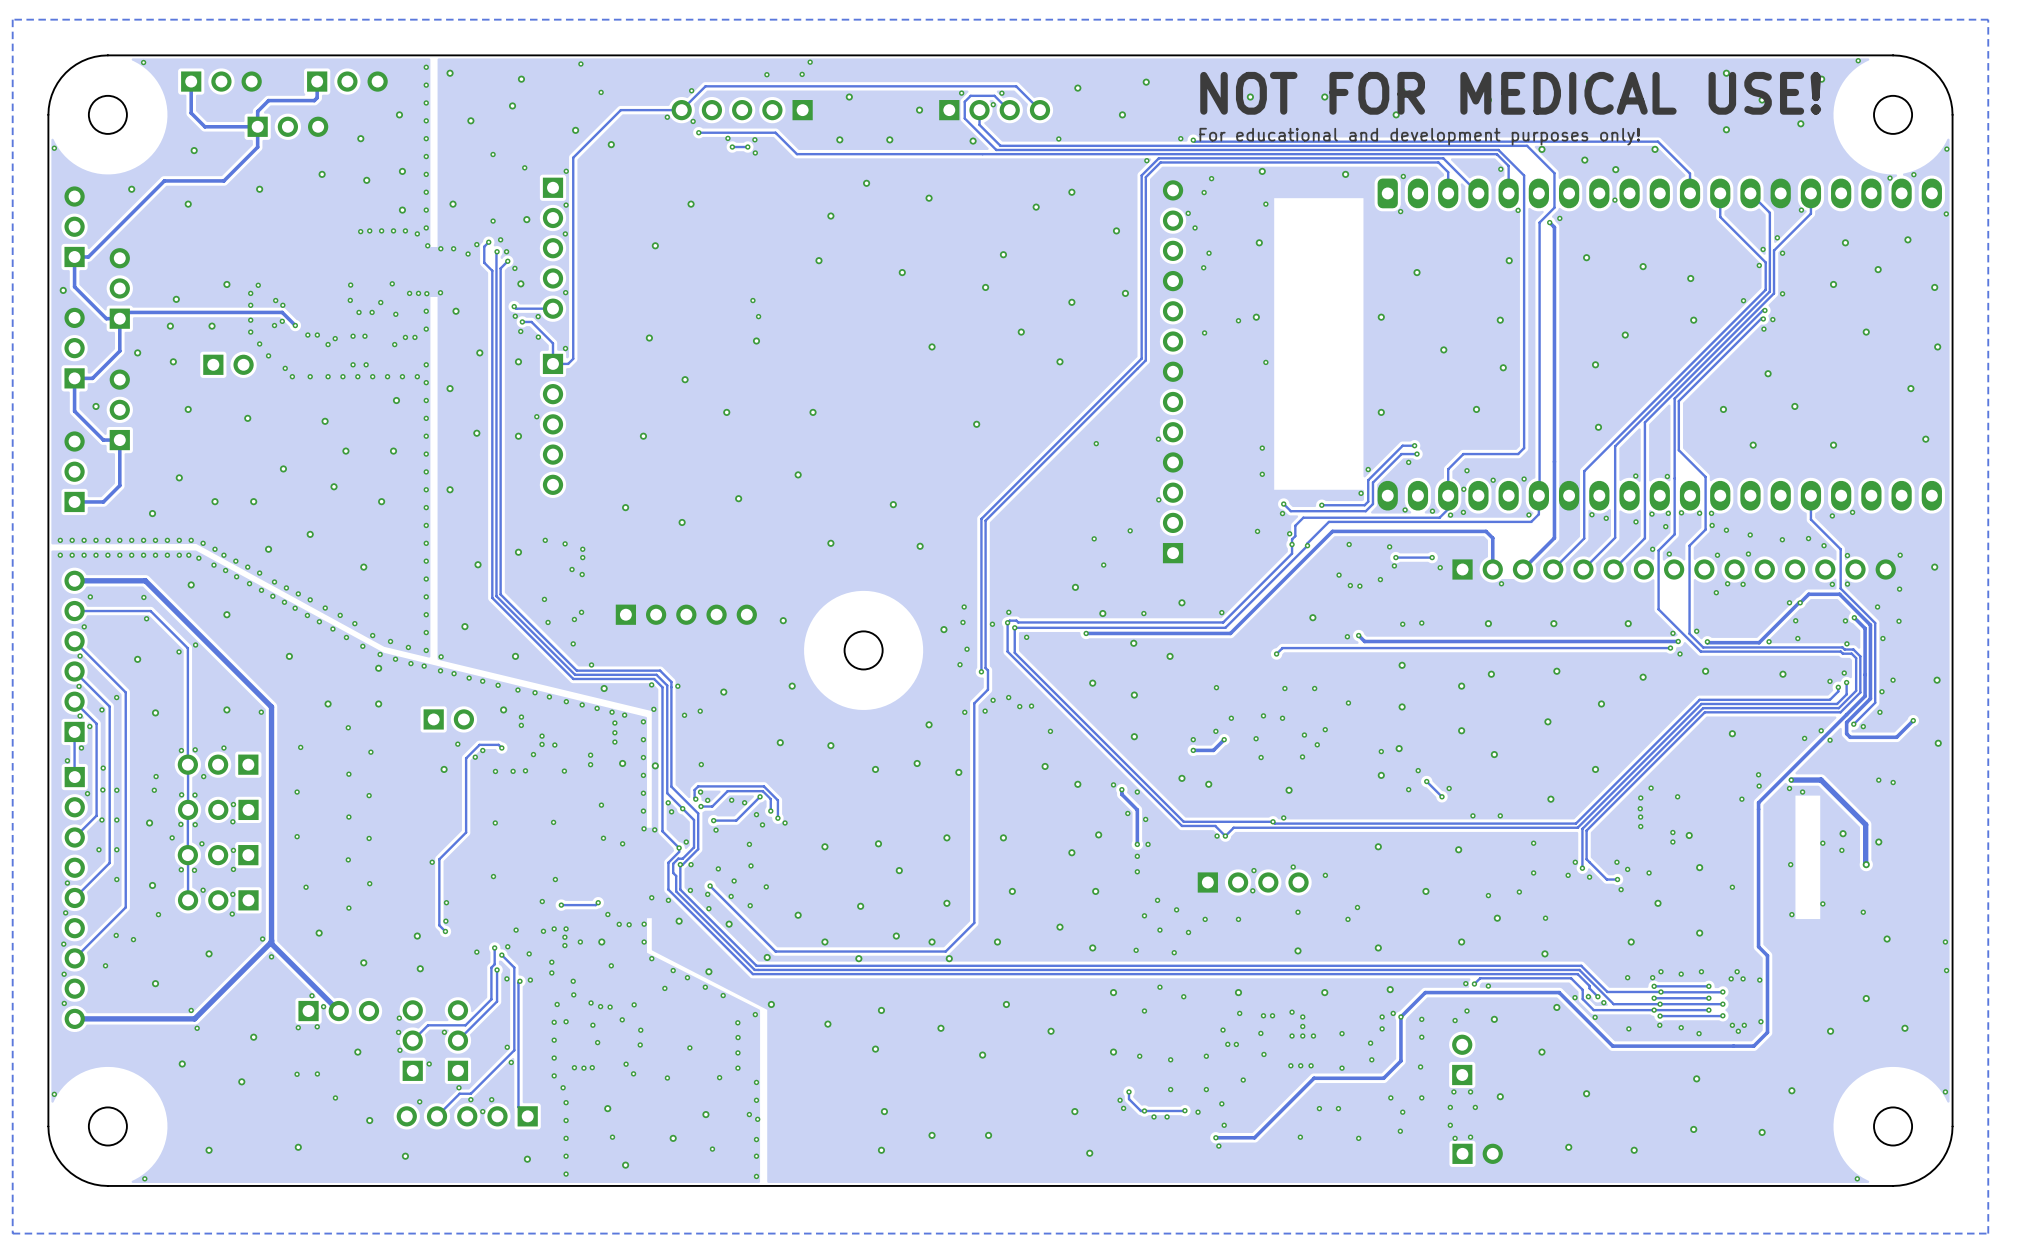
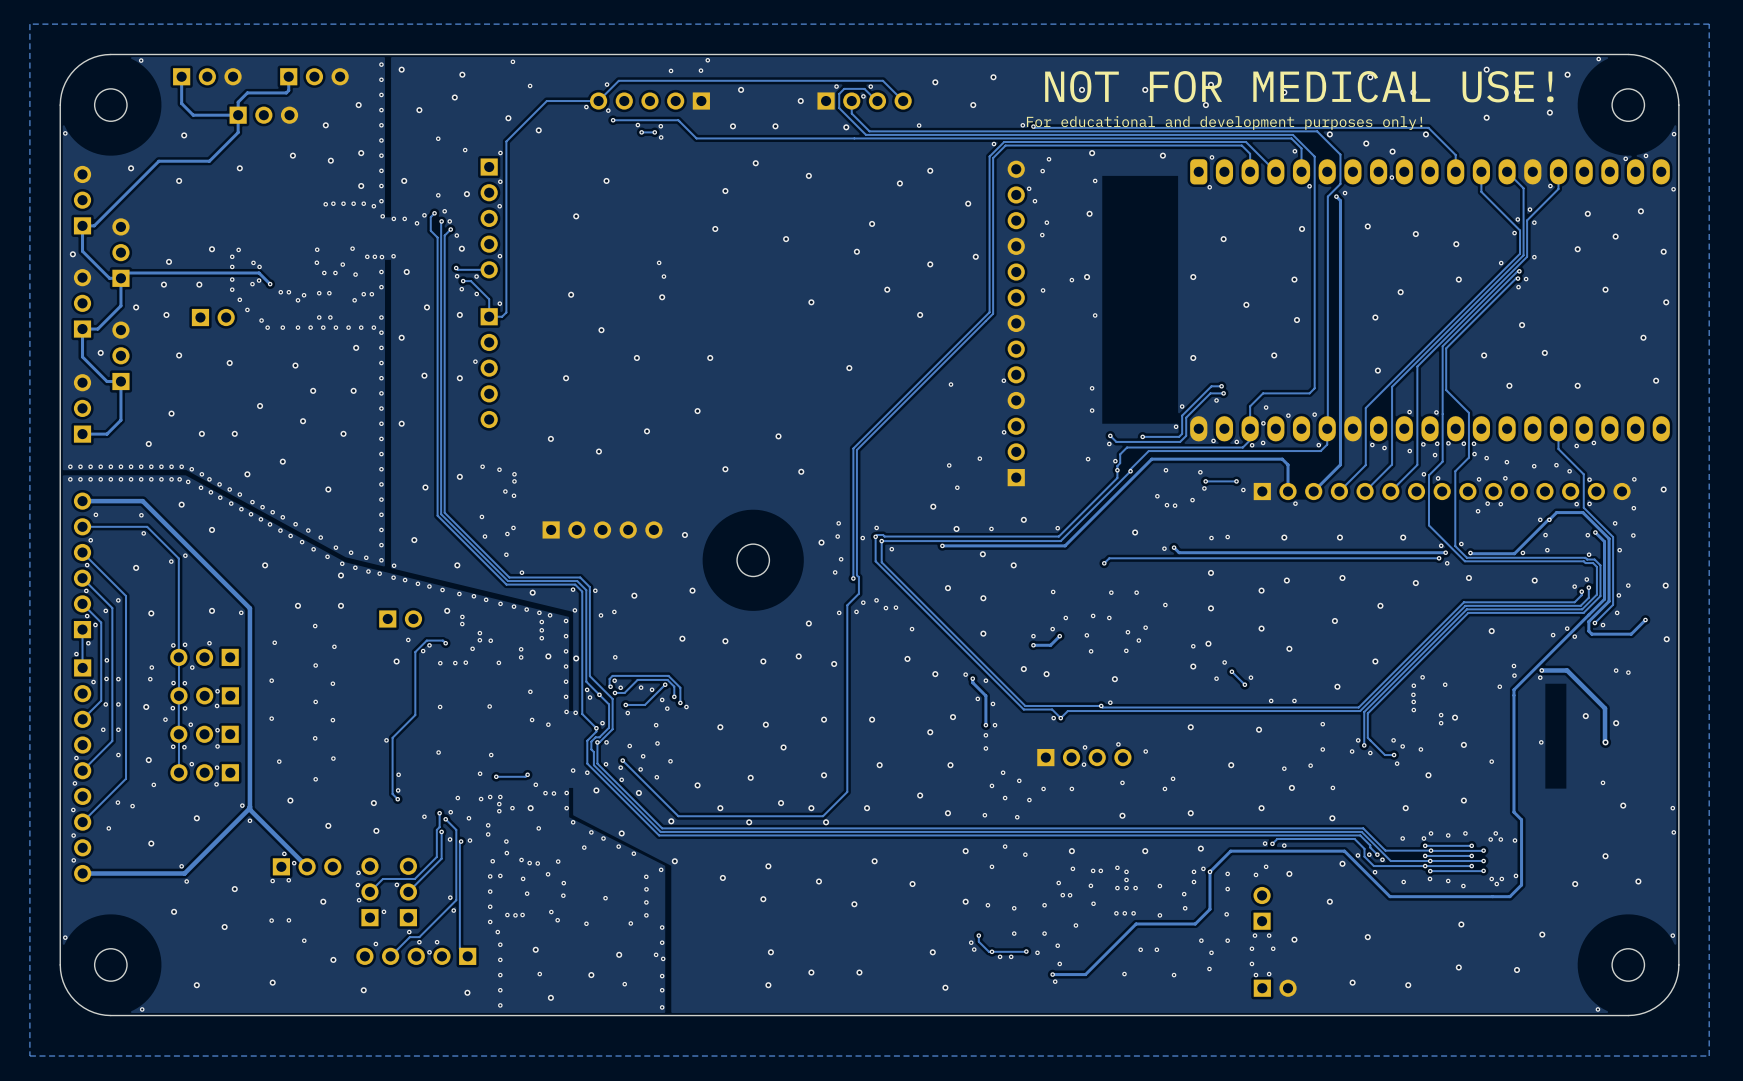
via: (1802, 792) -> none
via: (1822, 843) -> none
via: (1841, 850) -> none
via: (1822, 903) -> none
via: (1791, 914) -> none

